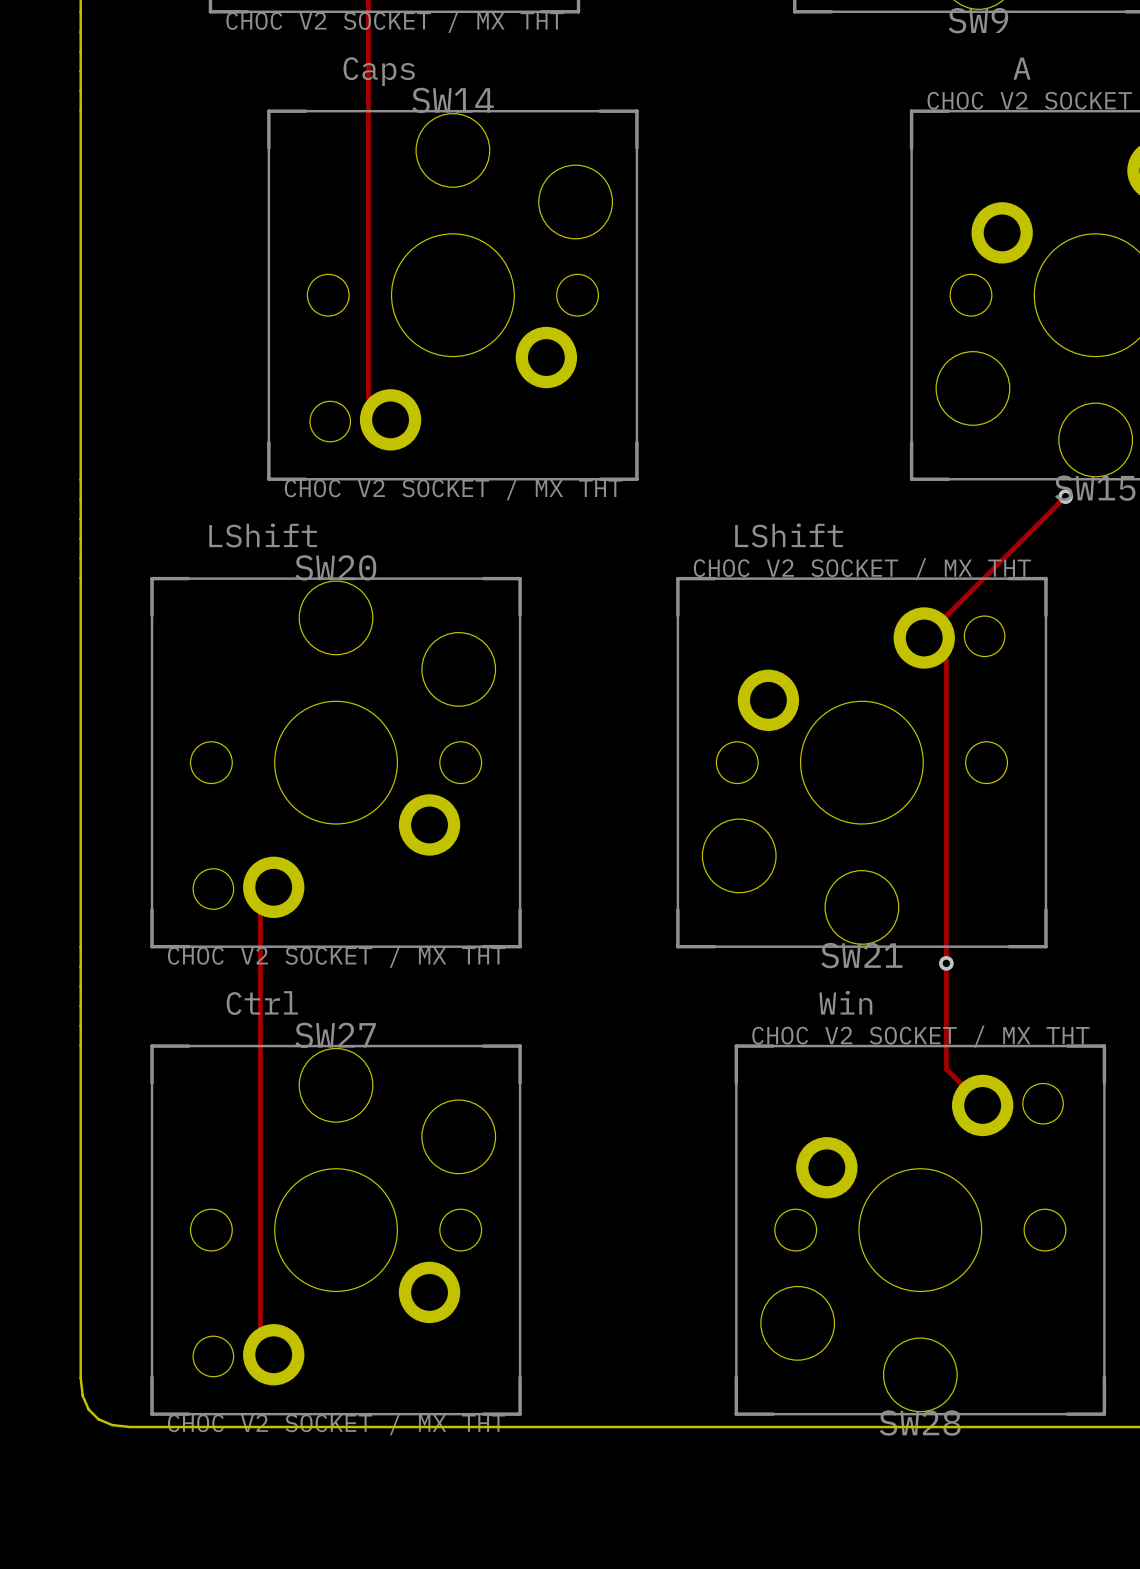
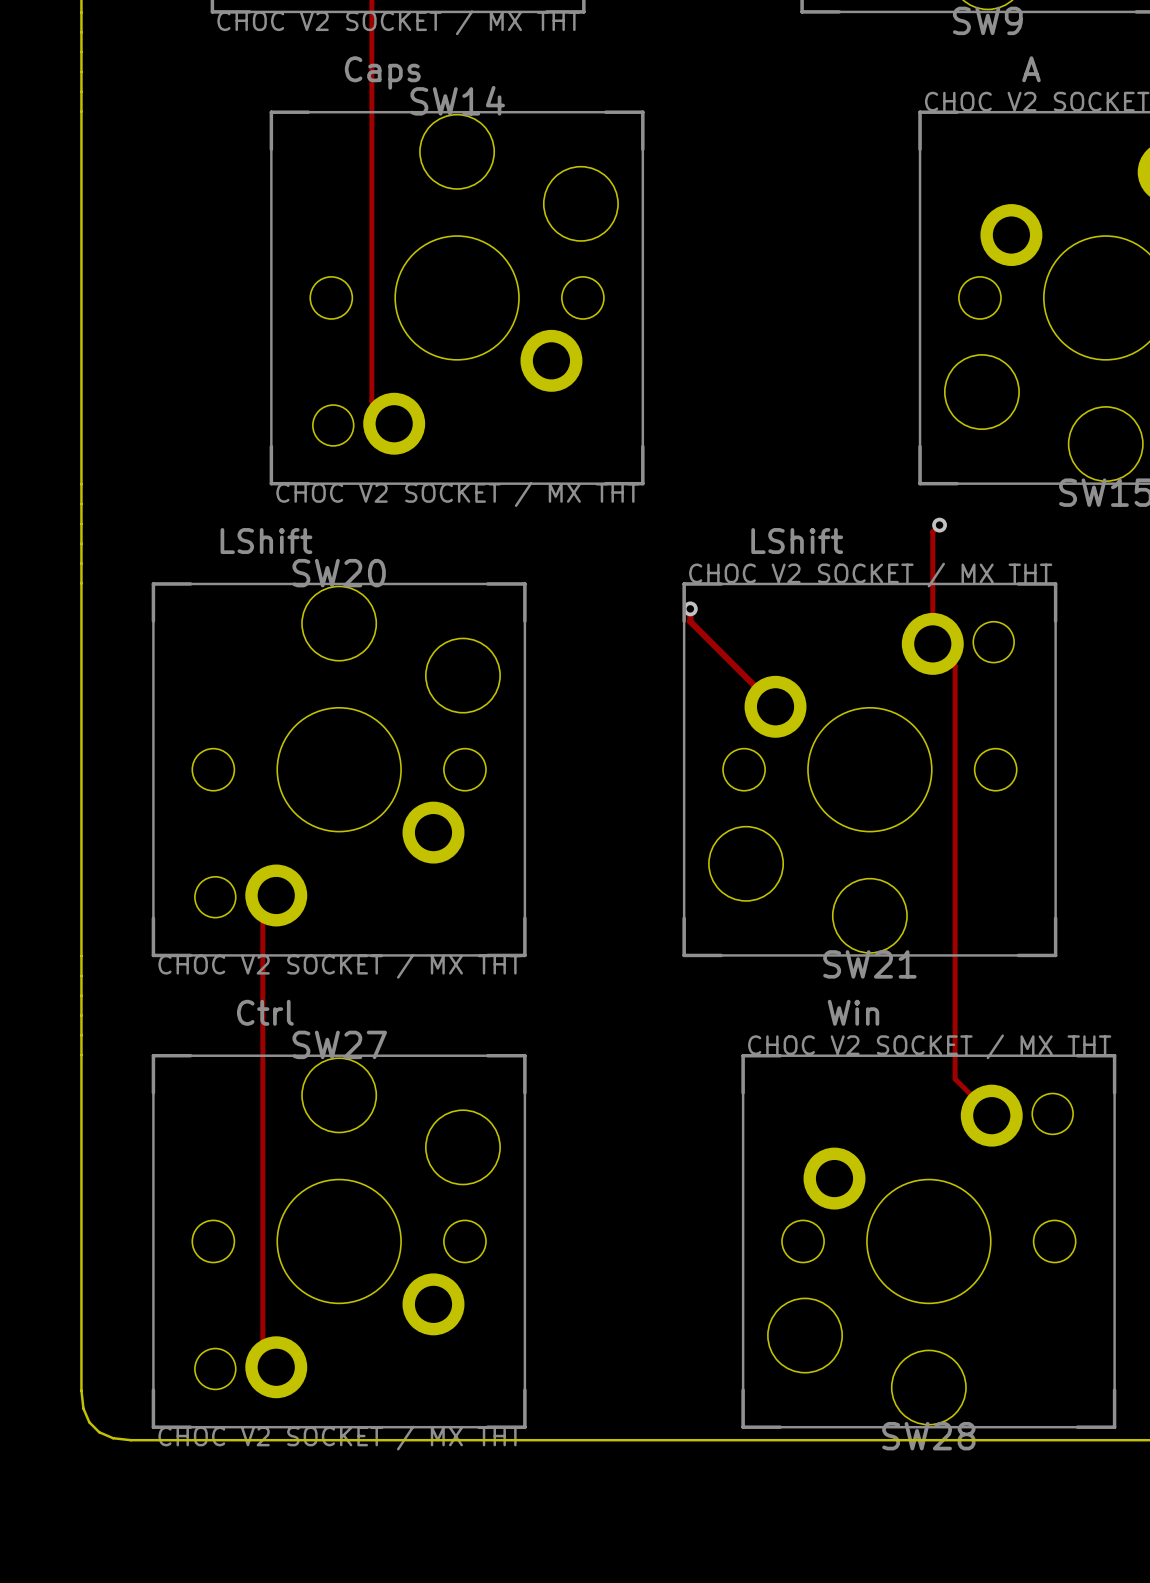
track: (1065, 496) (924, 638) -> (939, 525) (932, 531) (932, 643)
via position: (1065, 496) -> (939, 525)
track: none -> (690, 608) (690, 621) (775, 706)
via: none -> (690, 608)
via: (946, 963) -> none

